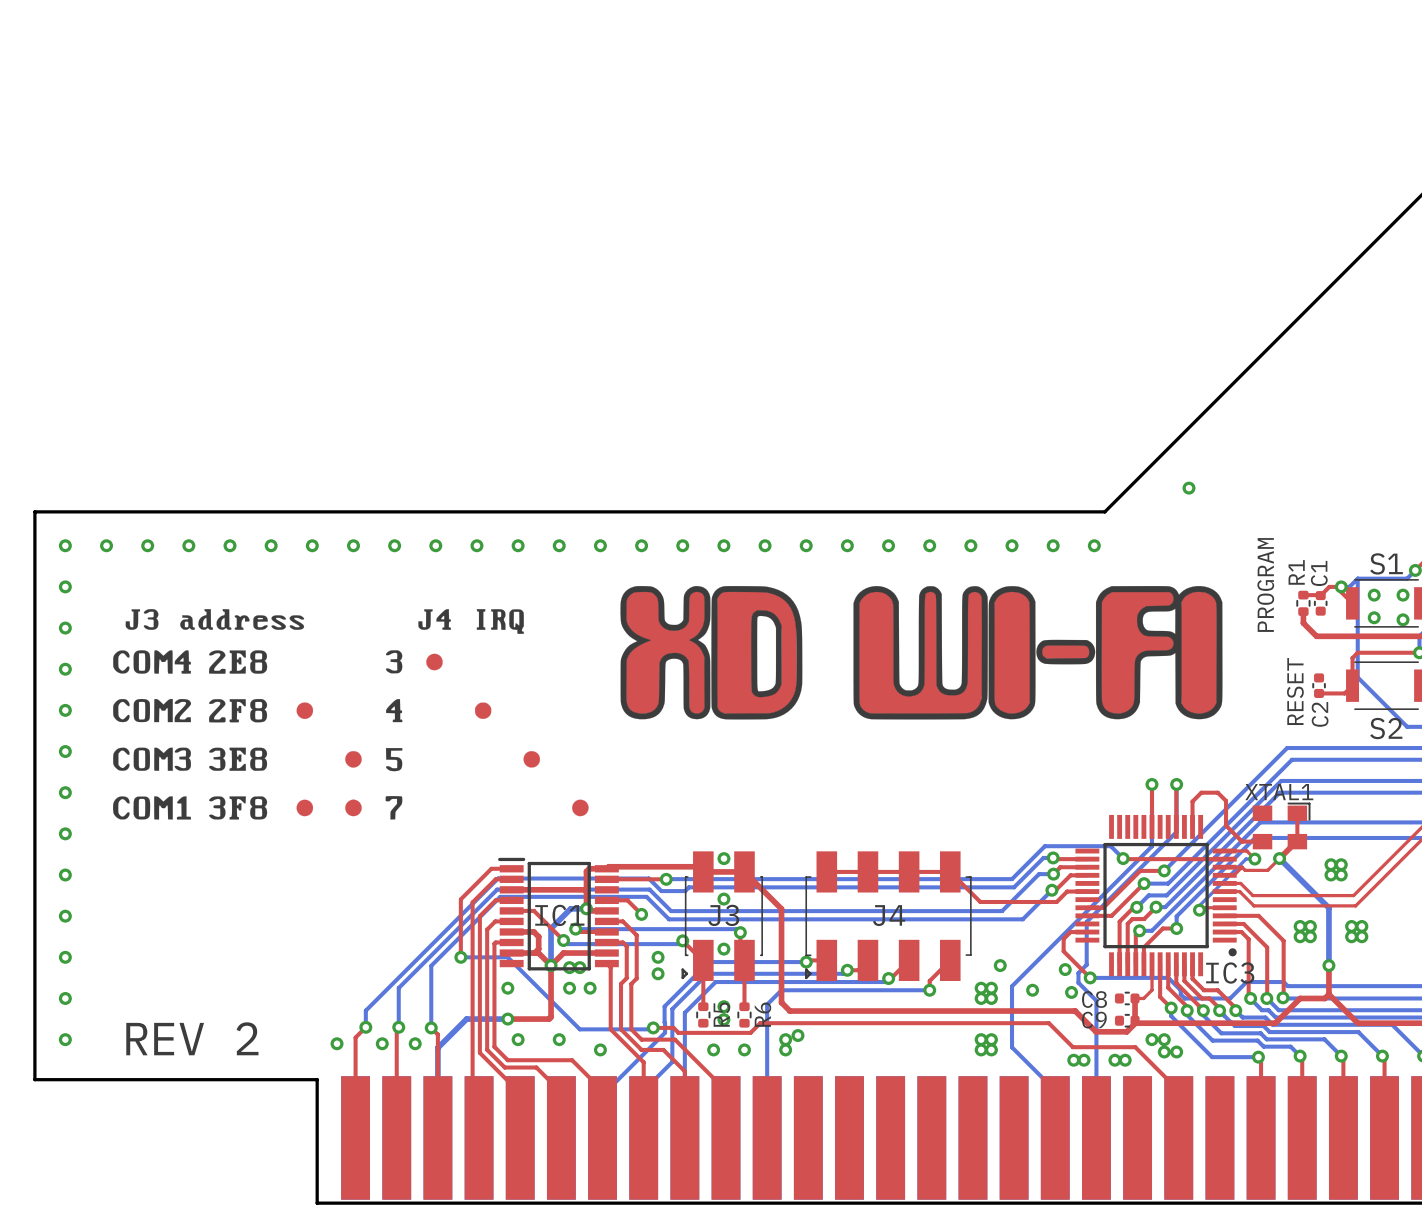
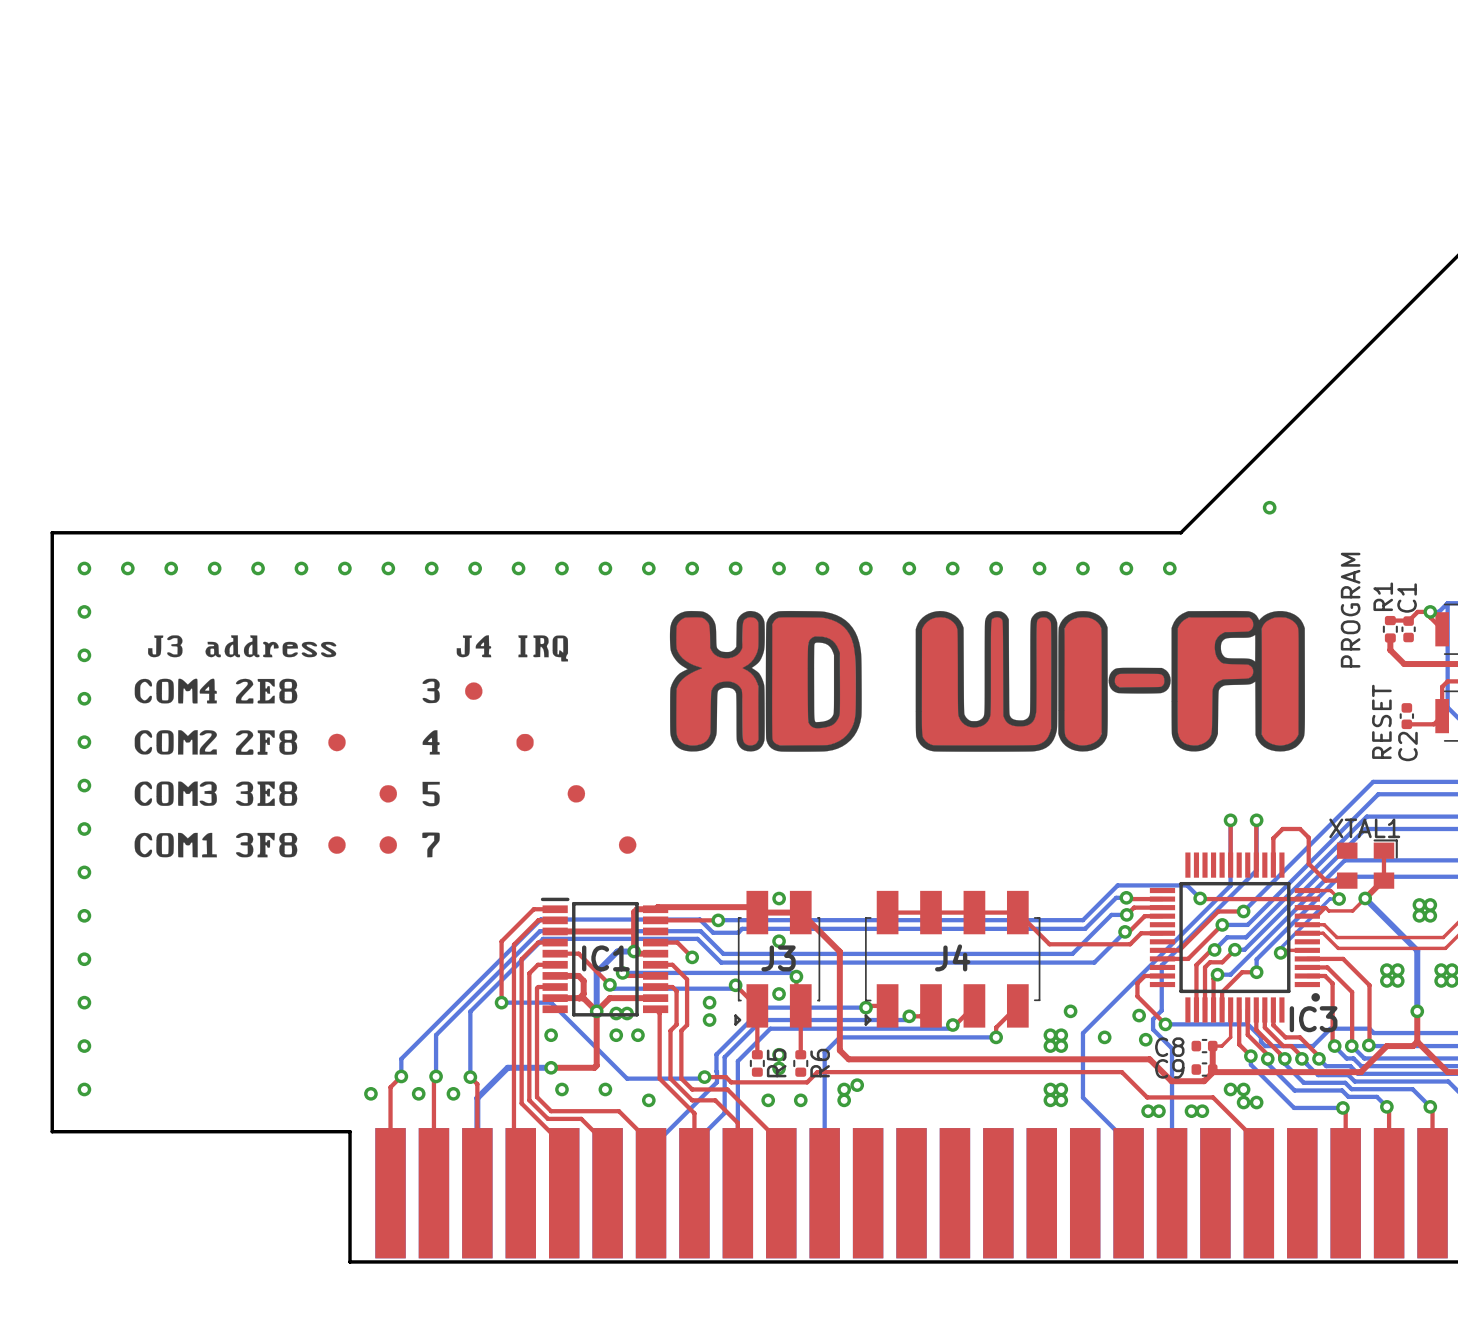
text: REV 2 (192, 1038) -> none

